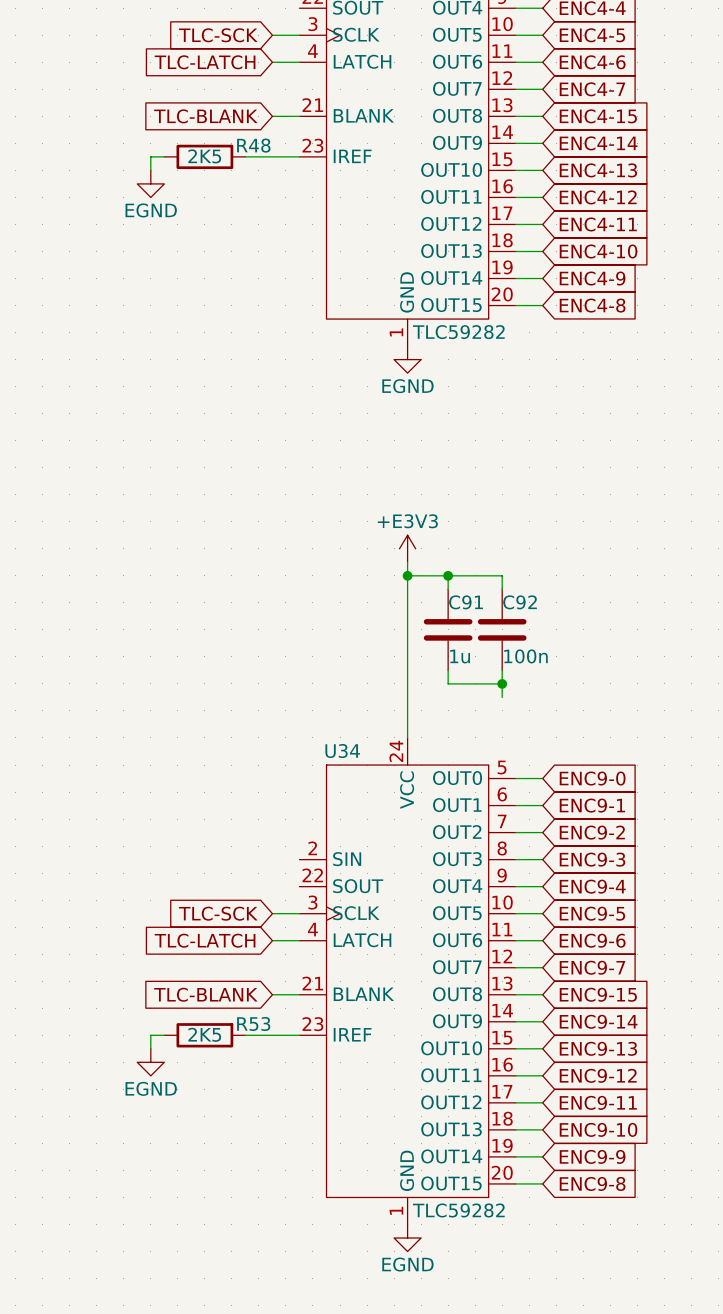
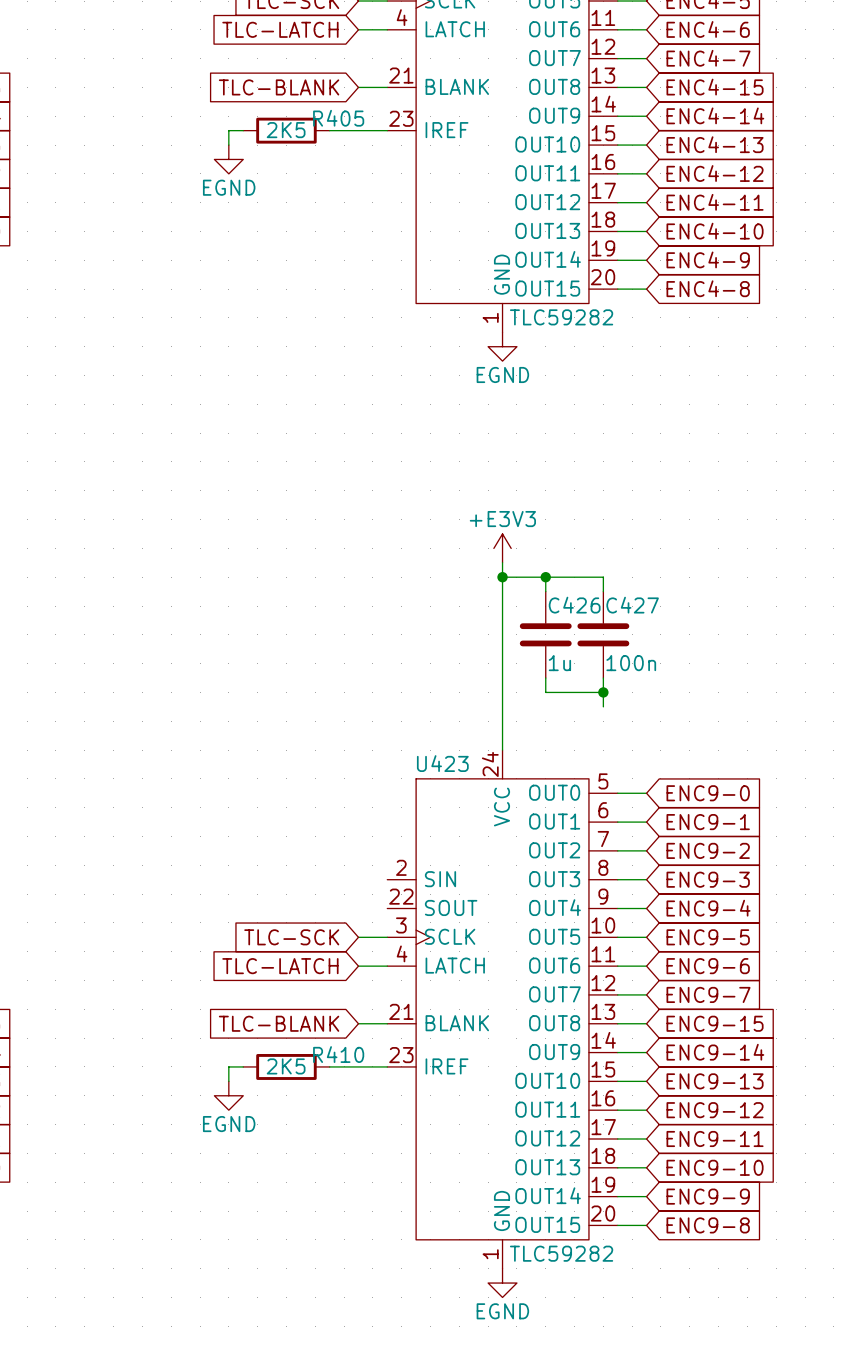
R48 name: R48 (253, 145) -> R405 (338, 118)
C91 name: C91 (466, 602) -> C426 (574, 605)
C92 name: C92 (520, 602) -> C427 (632, 605)
U34 name: U34 (342, 751) -> U423 (442, 763)
R53 name: R53 (253, 1023) -> R410 (338, 1054)

